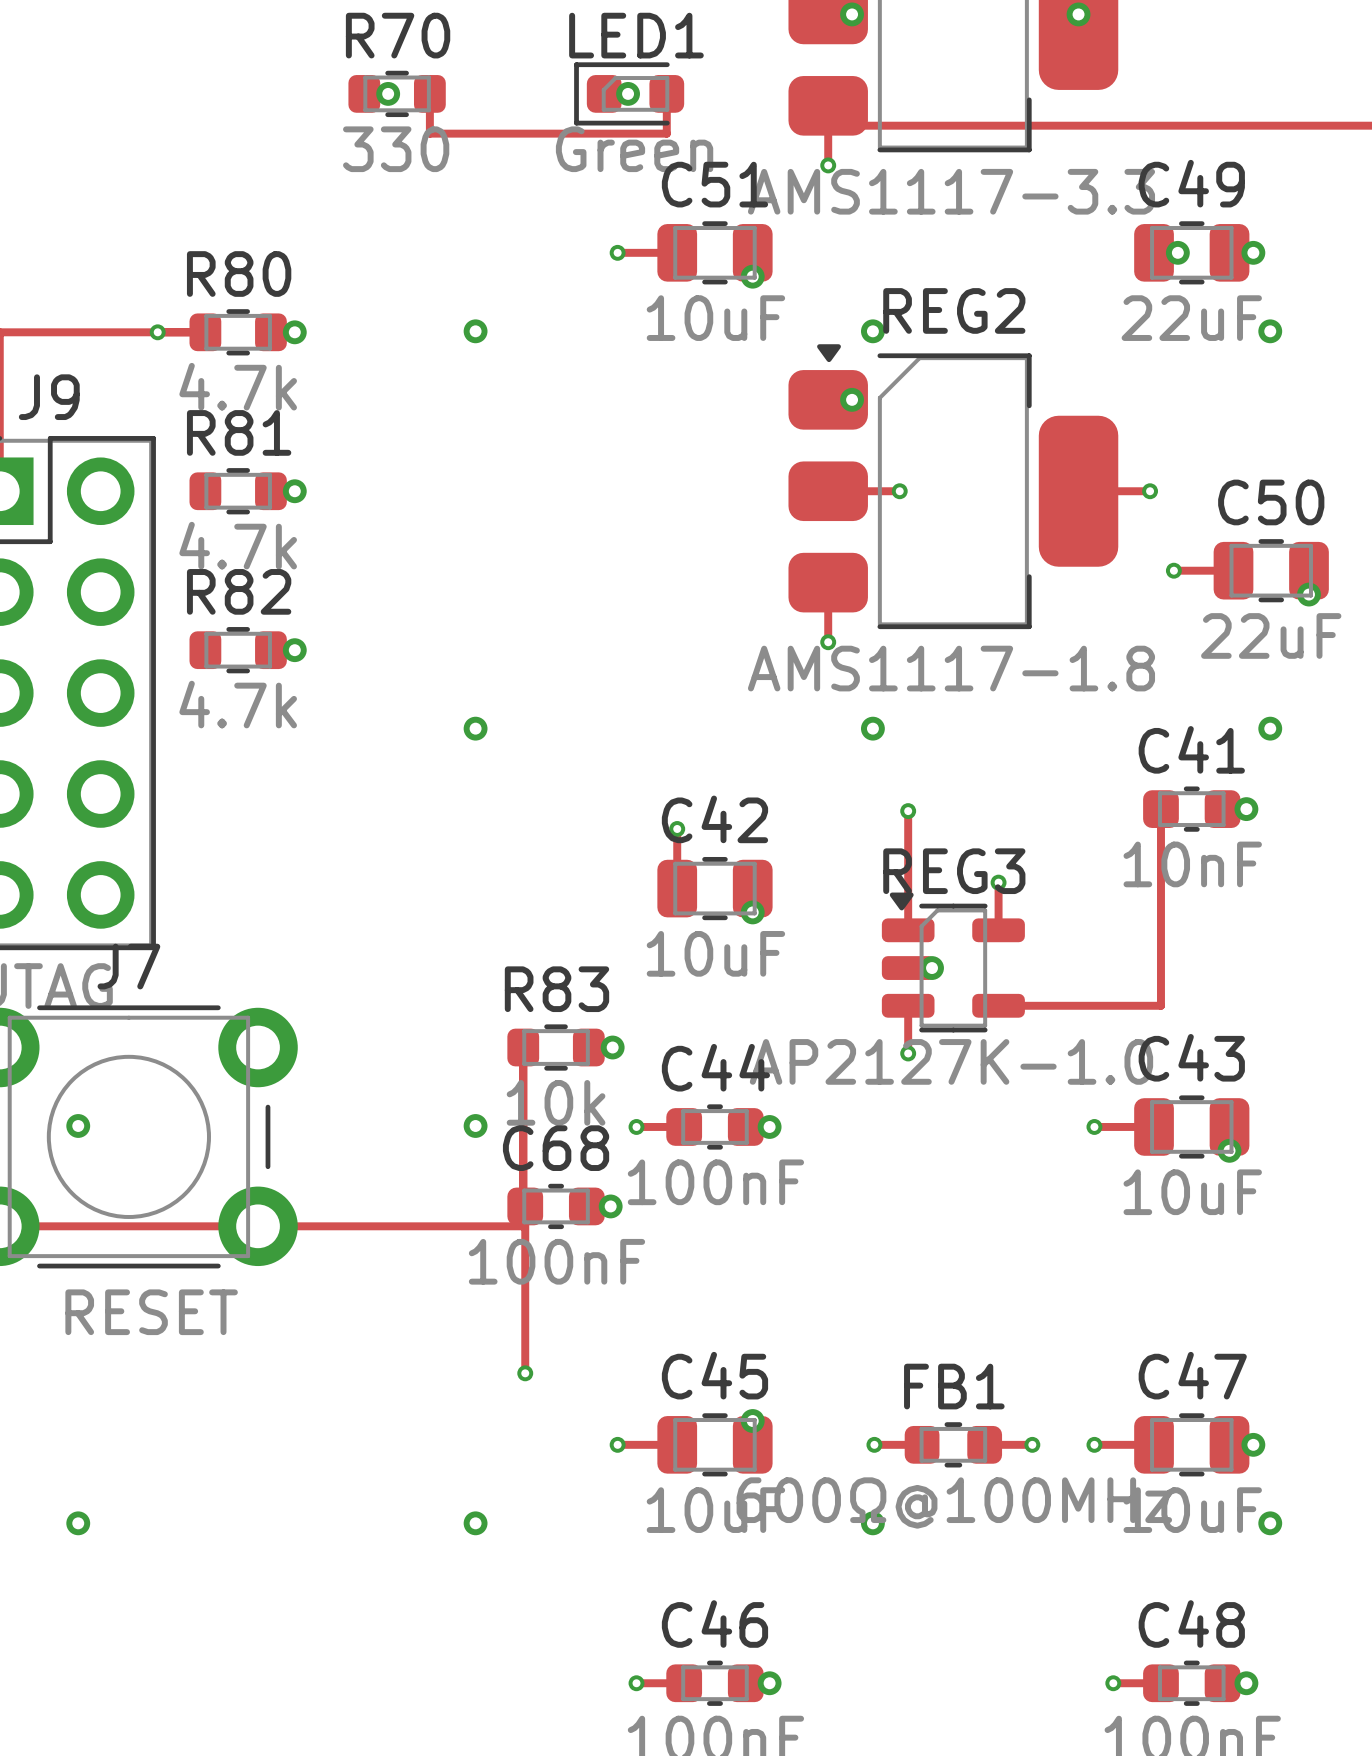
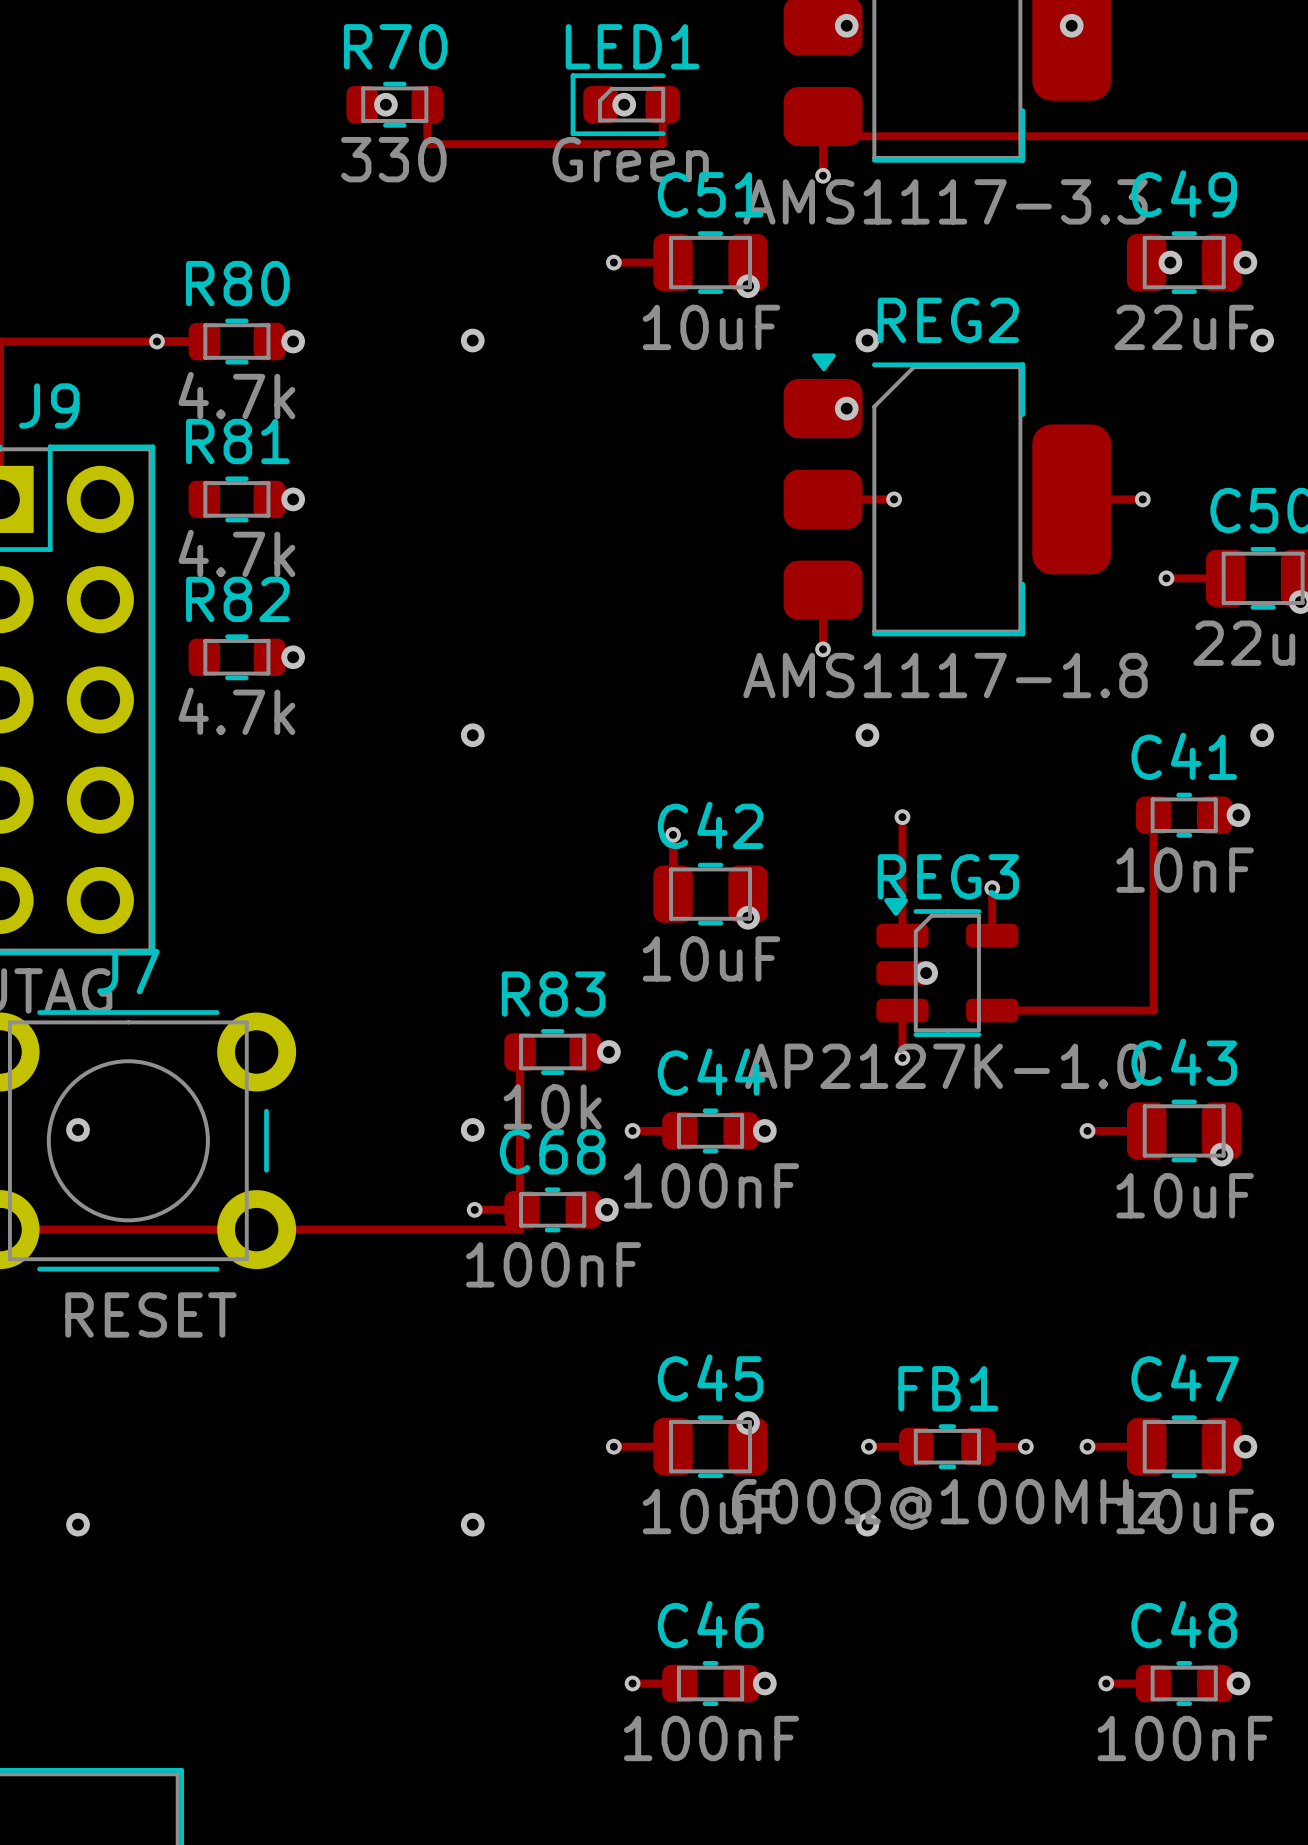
track: none -> (474, 1209) (520, 1209)
track: (525, 1206) (525, 1373) -> none
via position: (525, 1373) -> (474, 1209)

